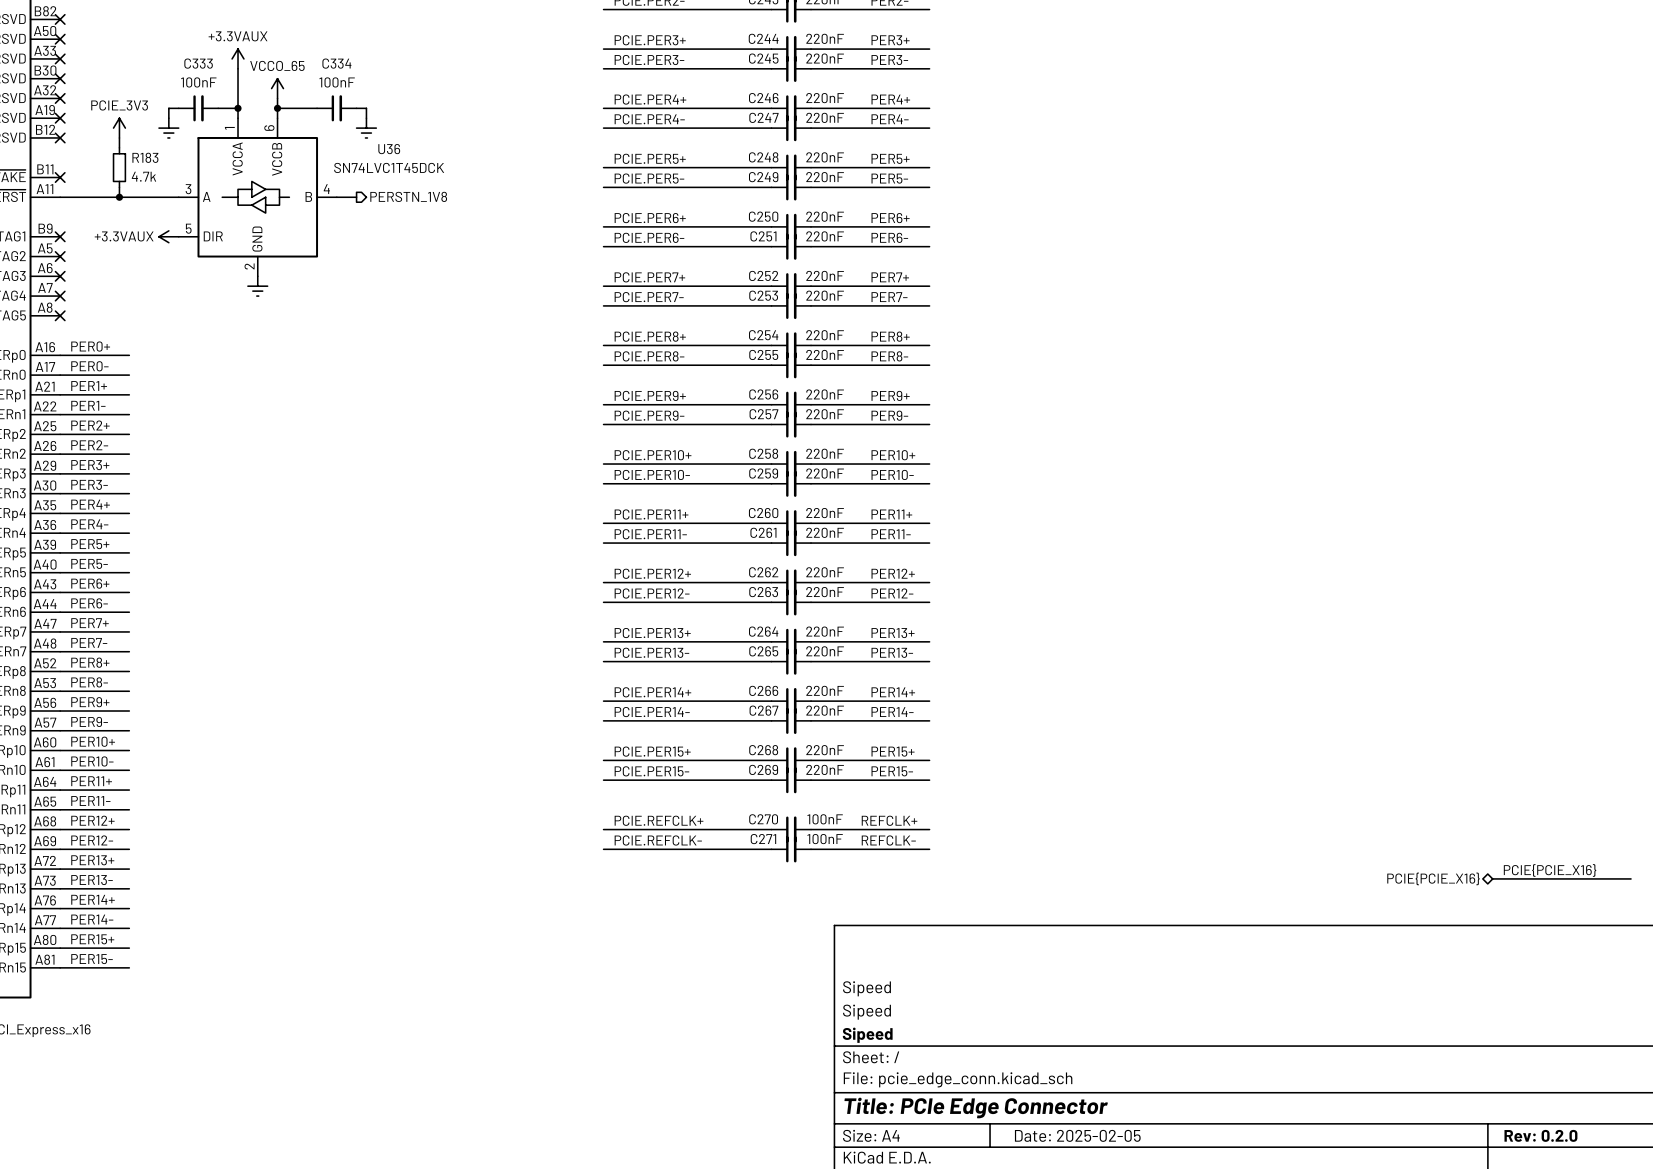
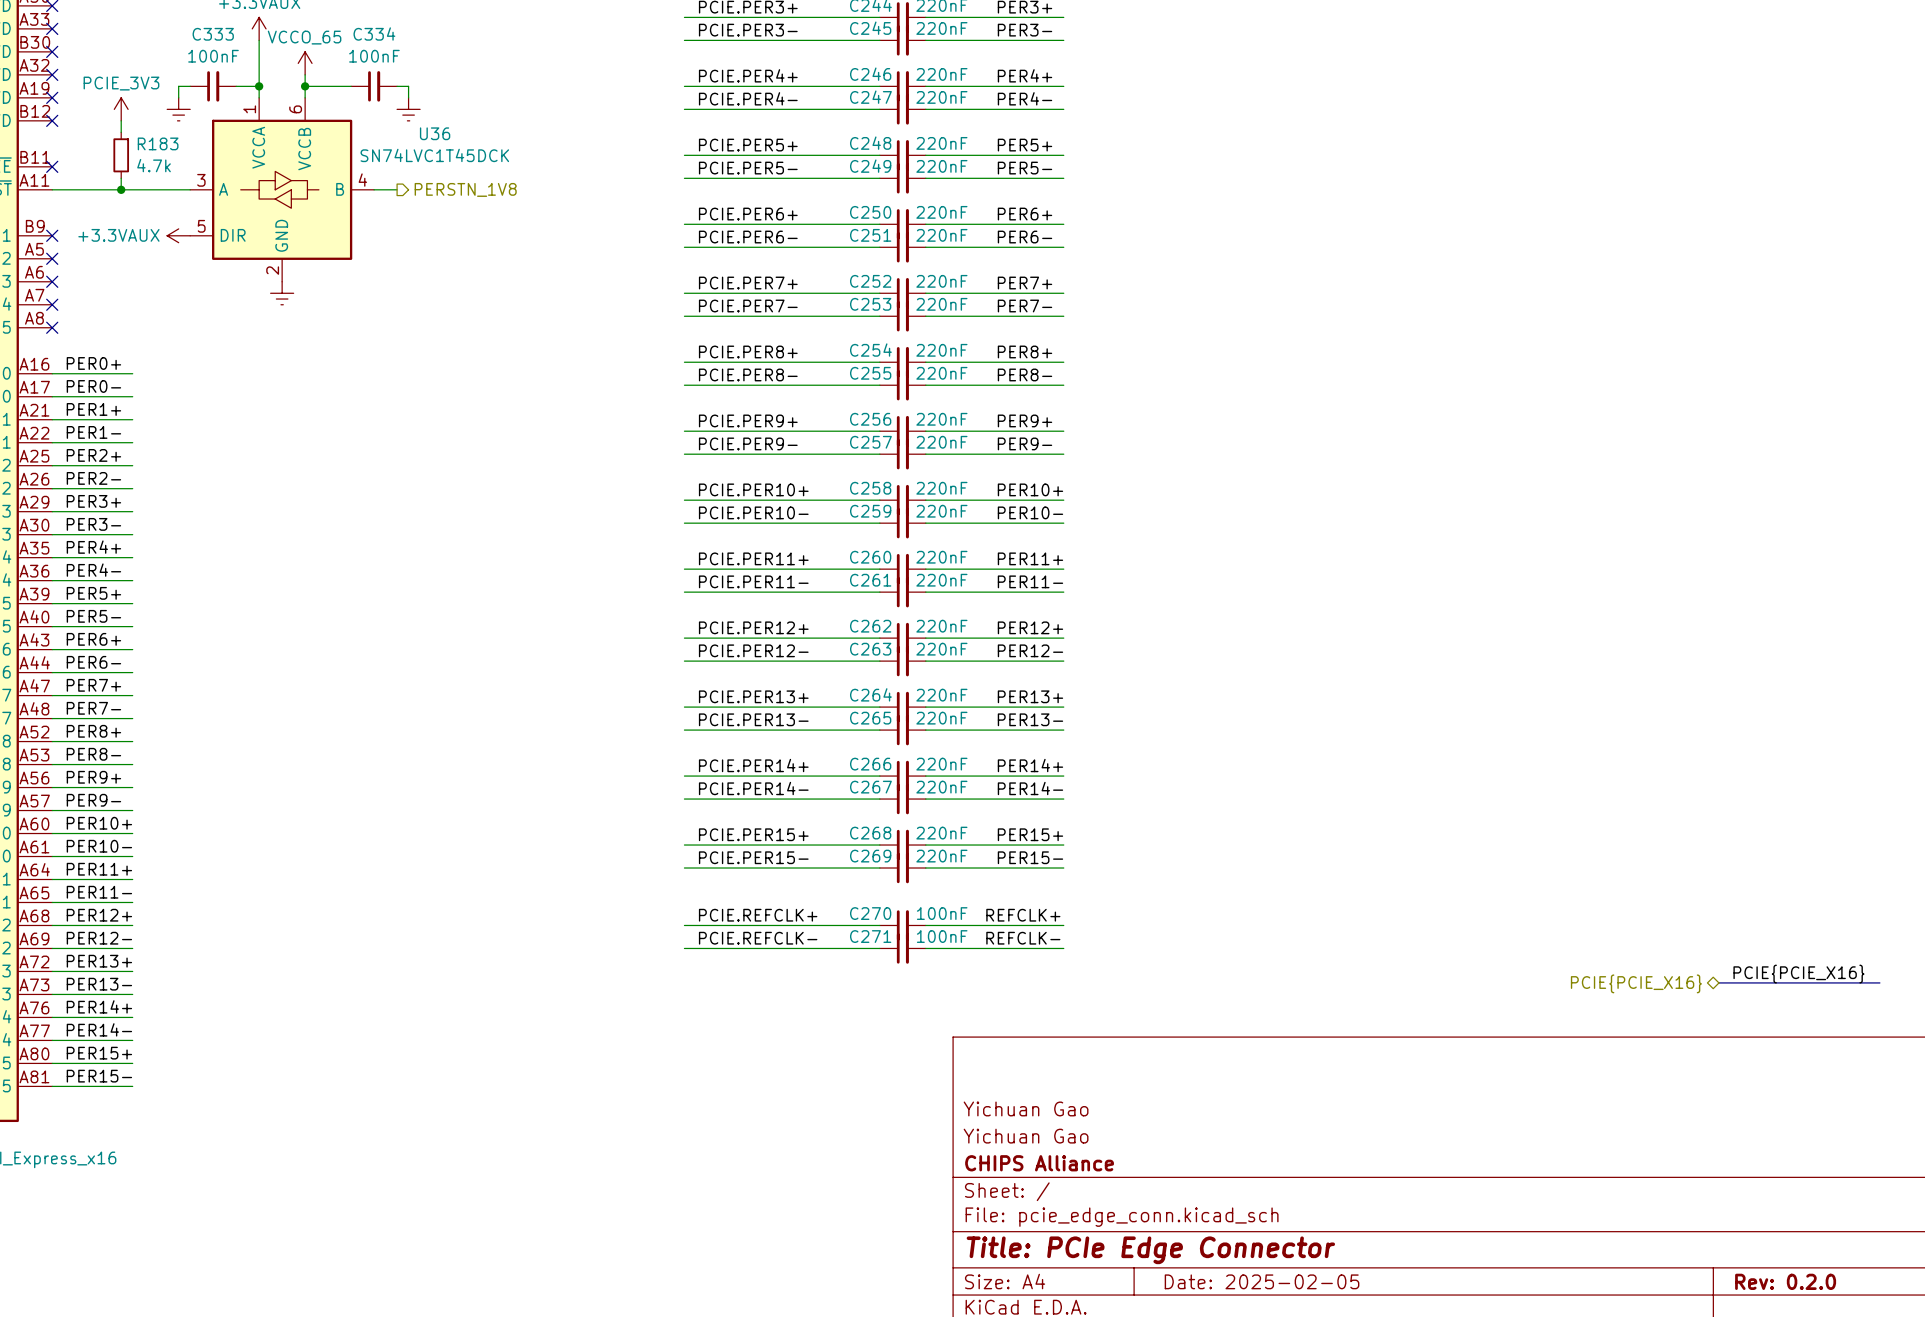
title block: Sipeed (867, 988) -> Yichuan Gao (1026, 1108)
title block: Sipeed (867, 1012) -> Yichuan Gao (1026, 1136)
title block: Sipeed (867, 1035) -> CHIPS Alliance (1039, 1163)

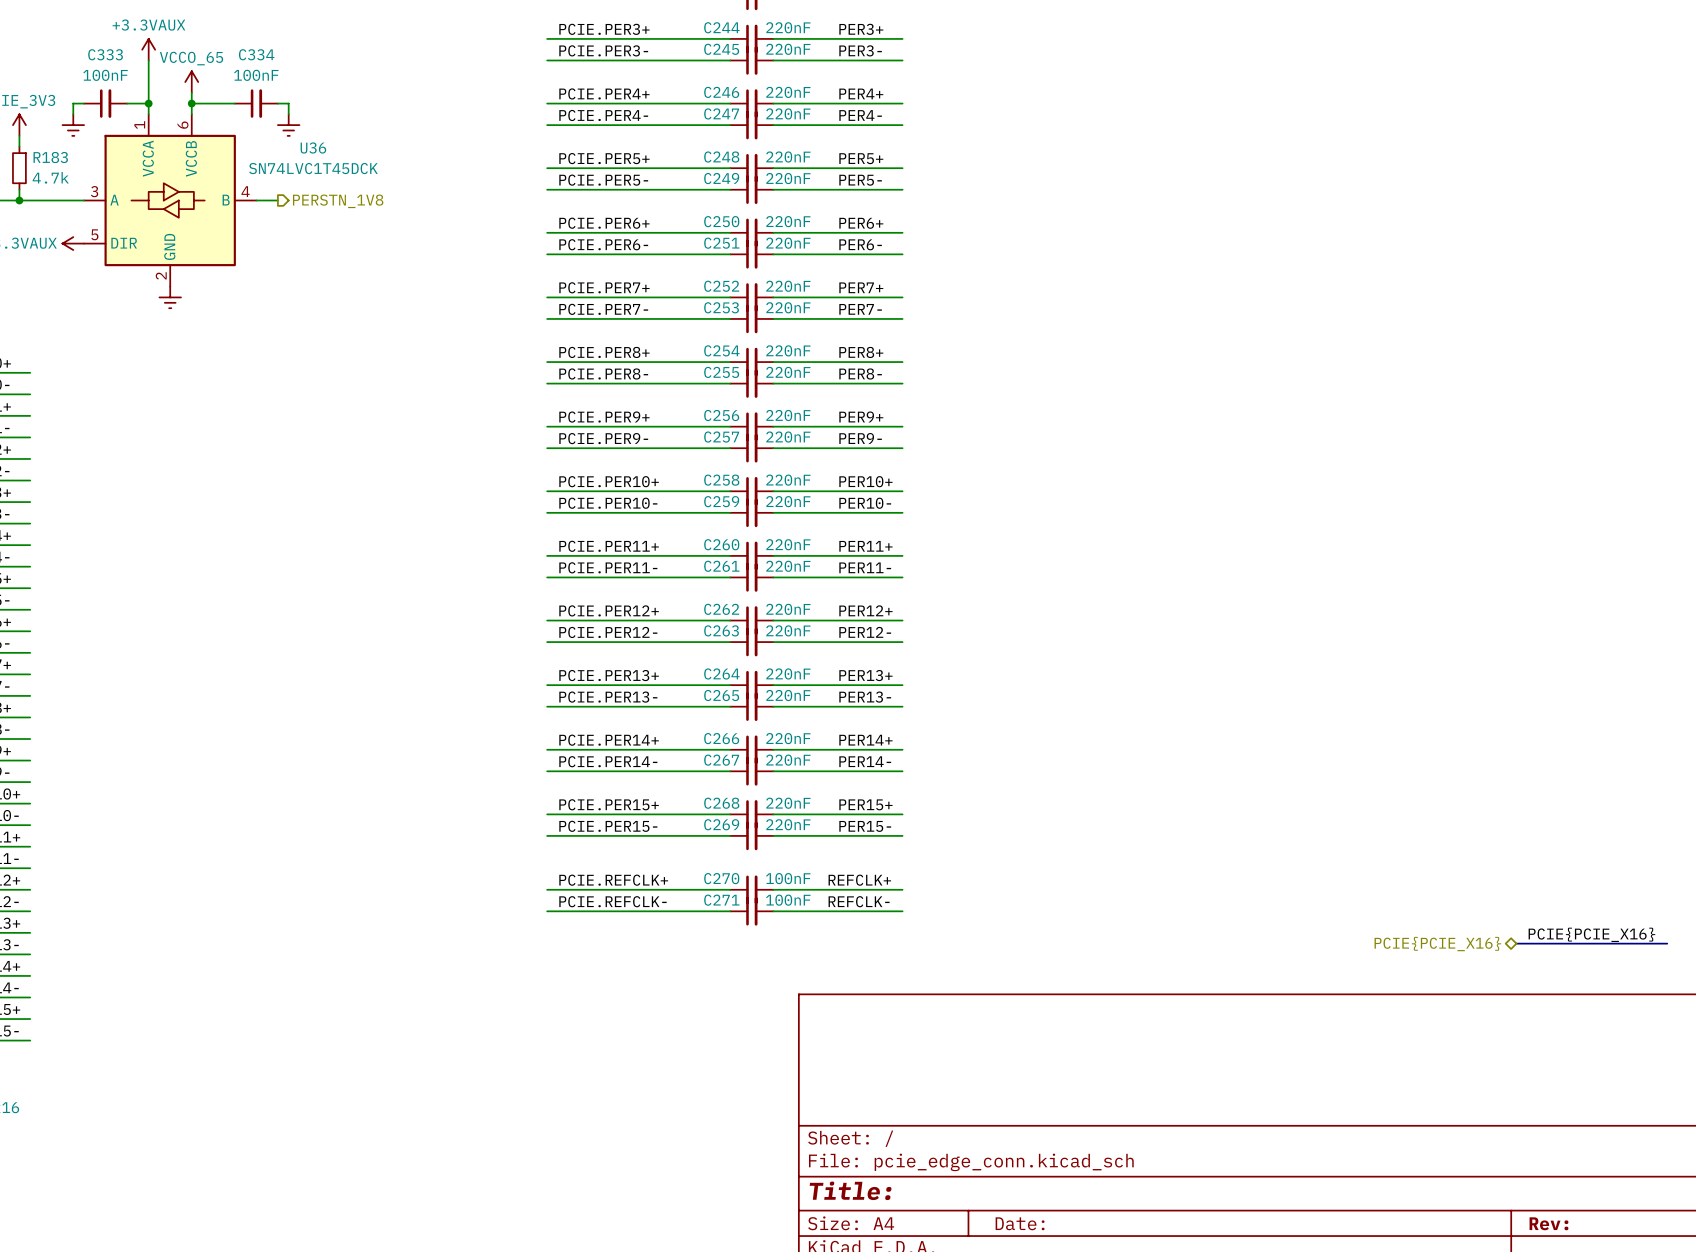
title block: Yichuan Gao (1026, 1108) -> none
title block: Yichuan Gao (1026, 1136) -> none
title block: CHIPS Alliance (1039, 1163) -> none
title block: Title: PCIe Edge Connector (1150, 1250) -> Title: (850, 1190)
title block: Date: 2025-02-05 (1262, 1281) -> Date: (1020, 1223)
title block: Rev: 0.2.0 (1785, 1281) -> Rev: (1548, 1223)

